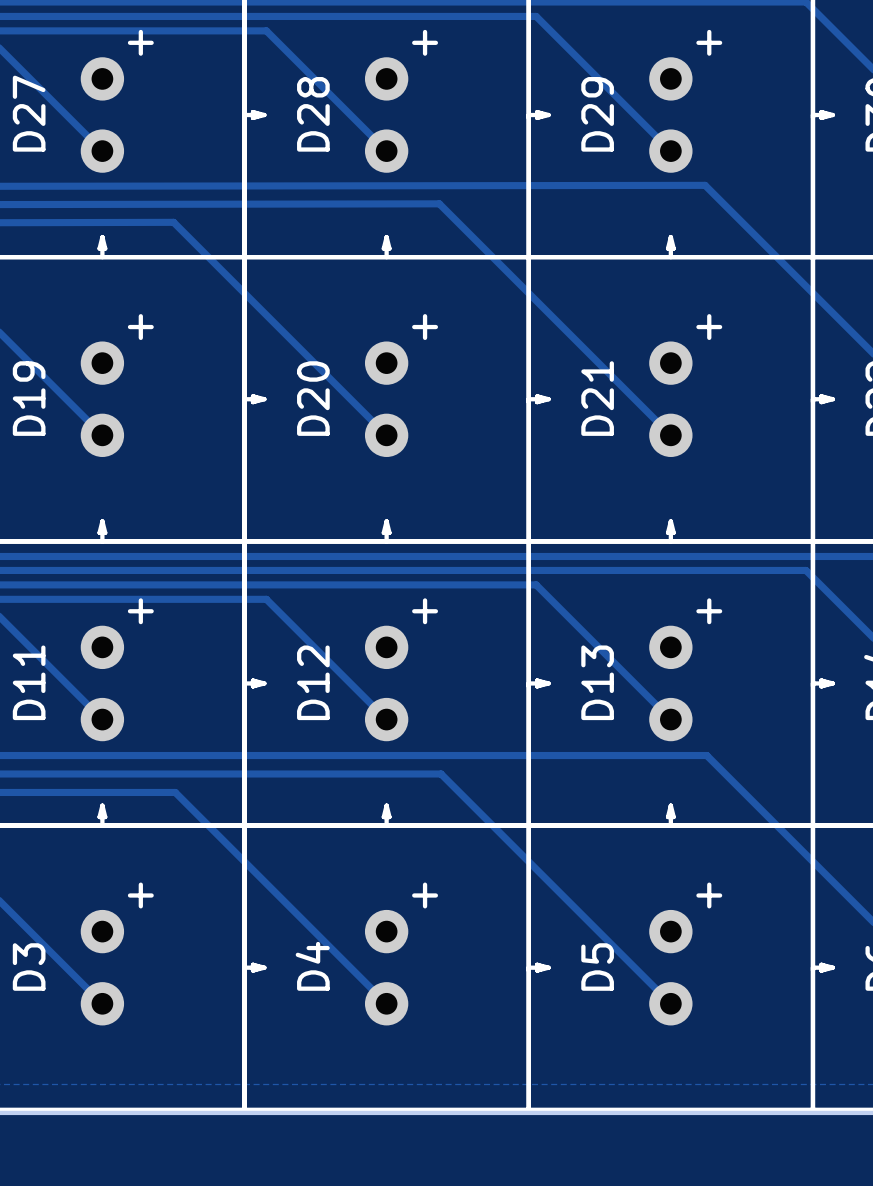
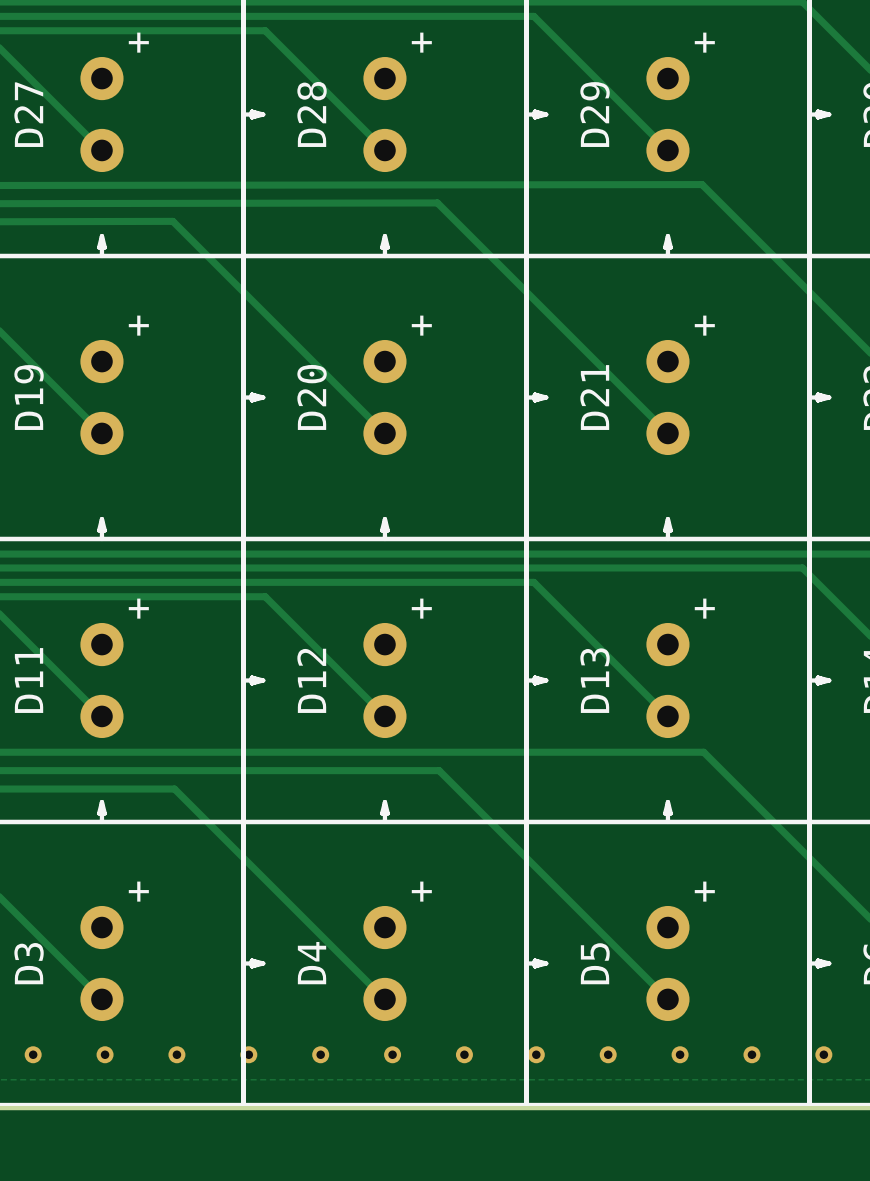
part: none -> (33, 1054)
part: none -> (105, 1054)
part: none -> (176, 1054)
part: none -> (248, 1054)
part: none -> (320, 1054)
part: none -> (392, 1054)
part: none -> (464, 1054)
part: none -> (536, 1054)
part: none -> (608, 1054)
part: none -> (680, 1054)
part: none -> (751, 1054)
part: none -> (823, 1054)

